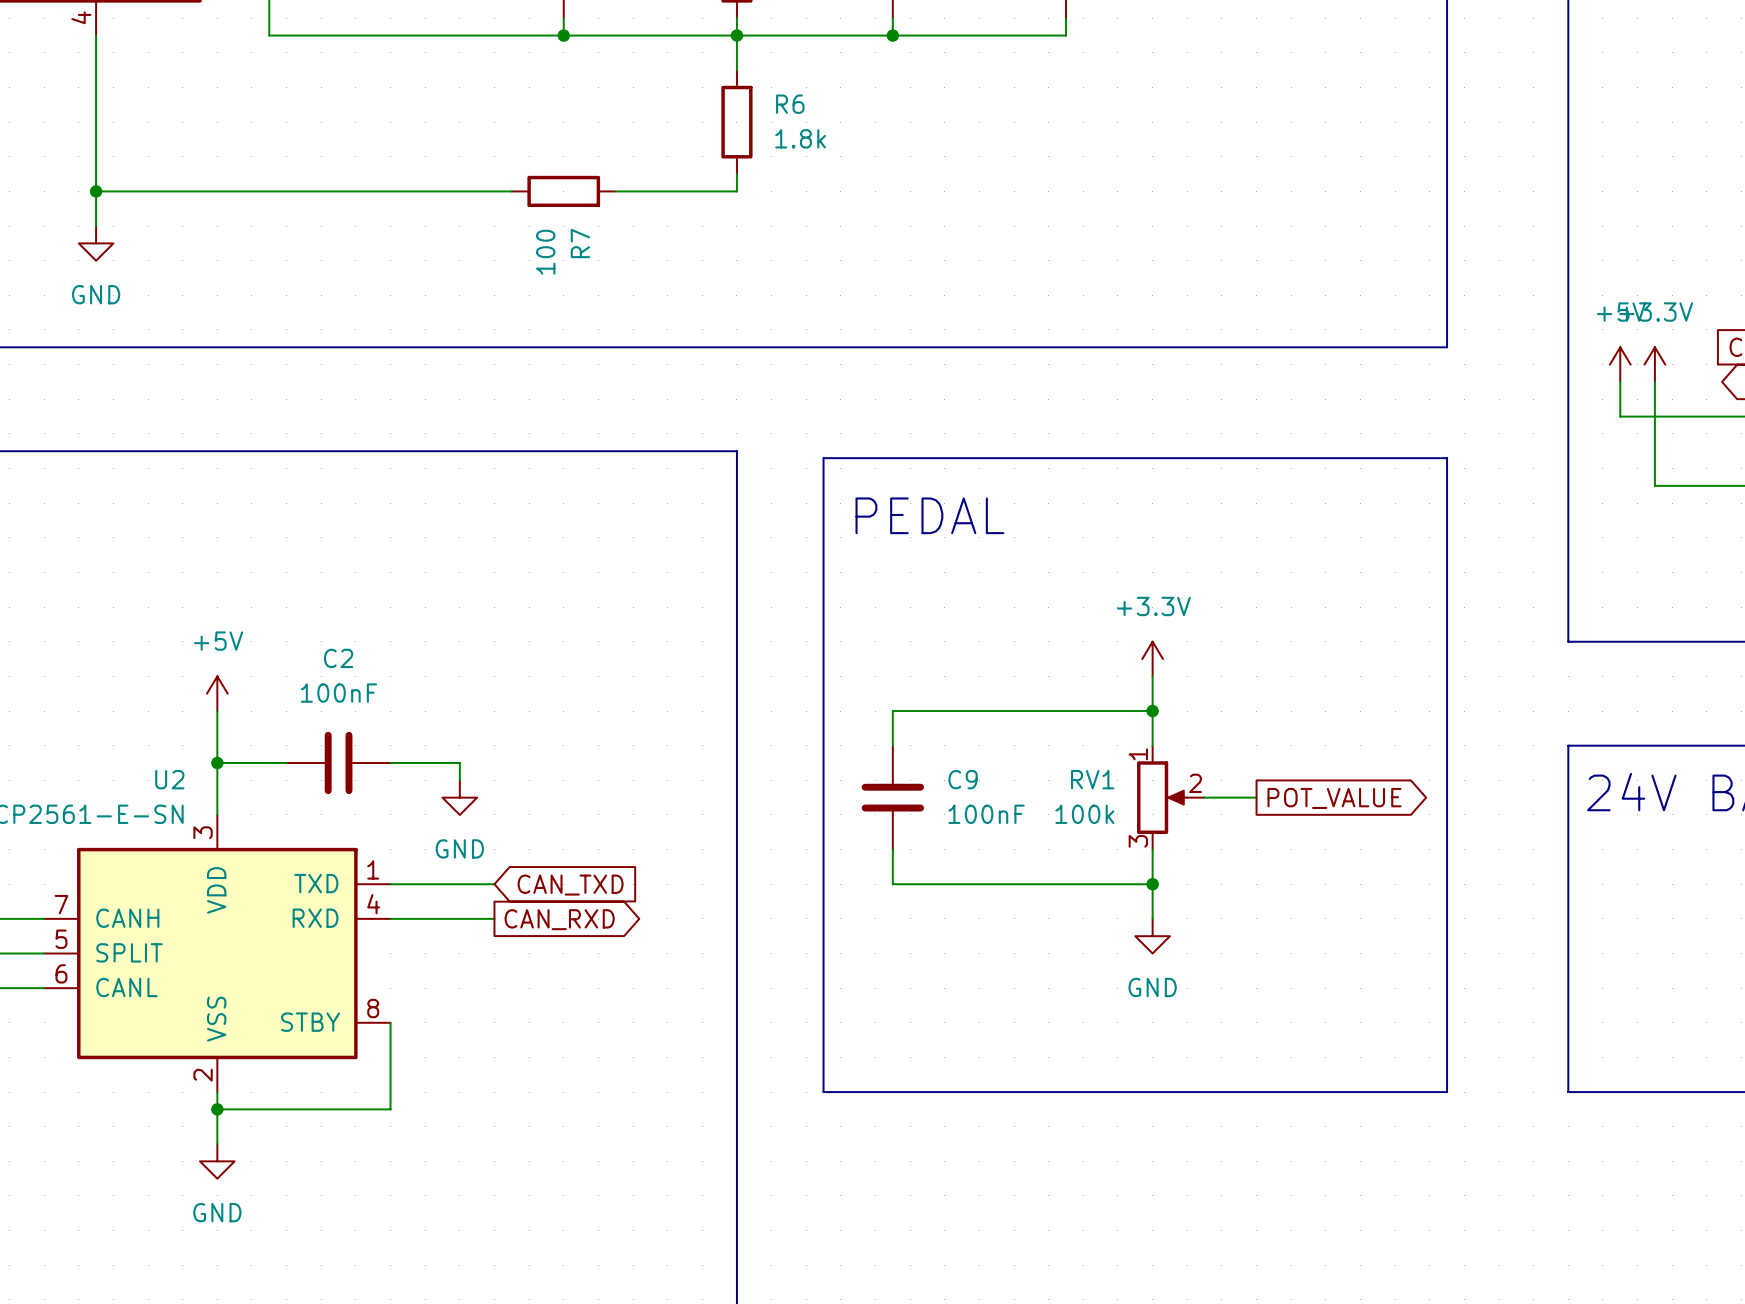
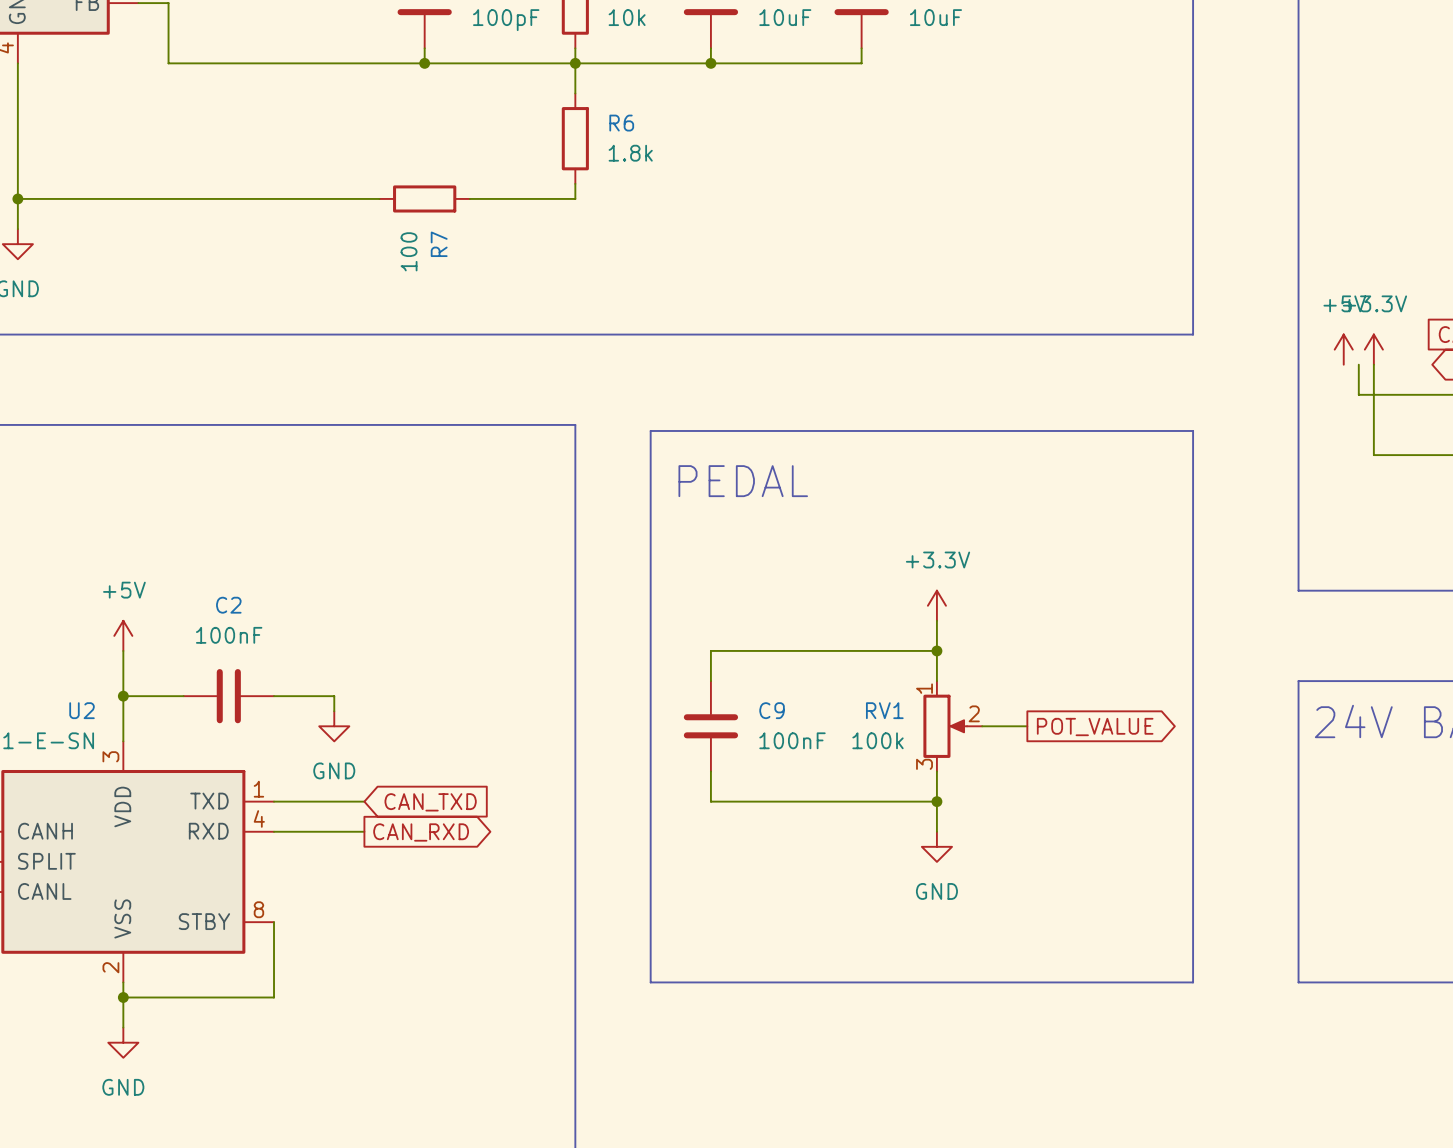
wire: (1620, 381) (1620, 416) (1637, 416) -> (1358, 364) (1358, 394)

